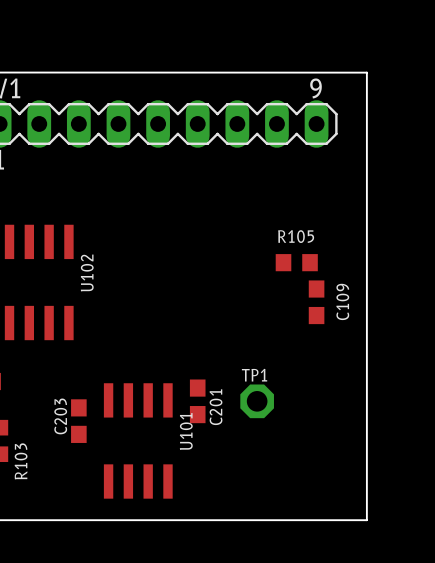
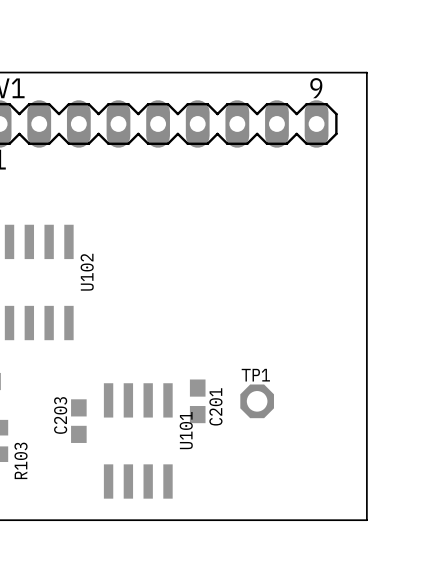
R105: (296, 262) -> none
C109: (316, 302) -> none

